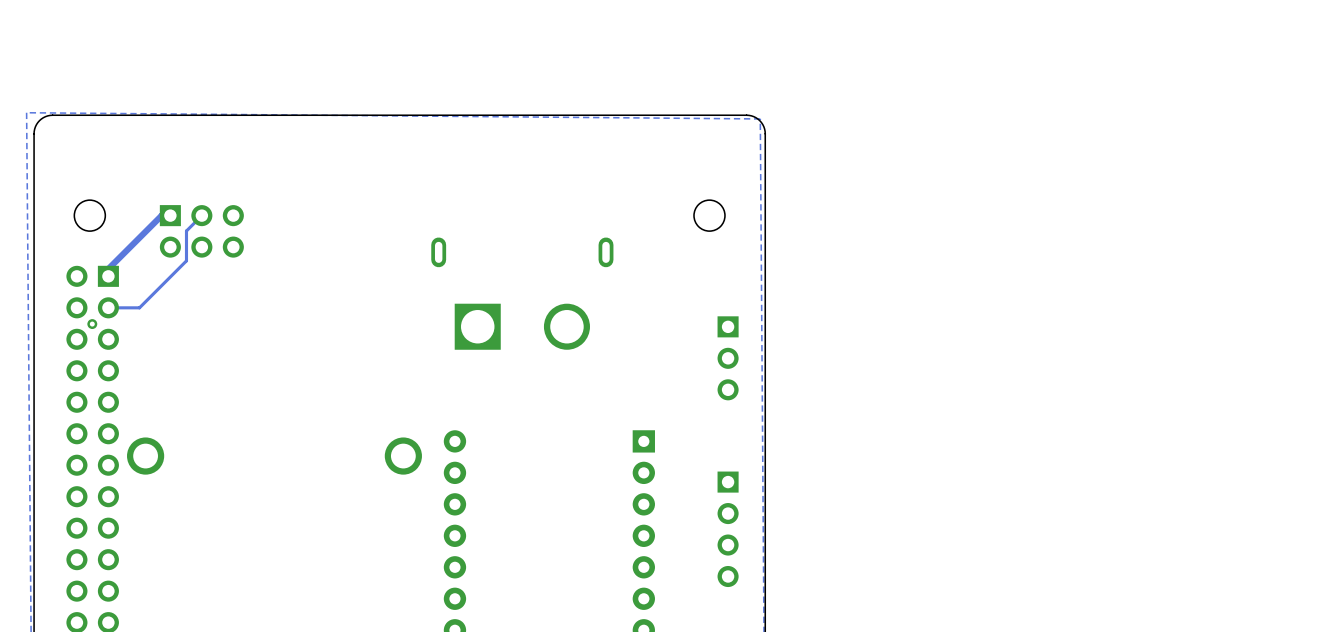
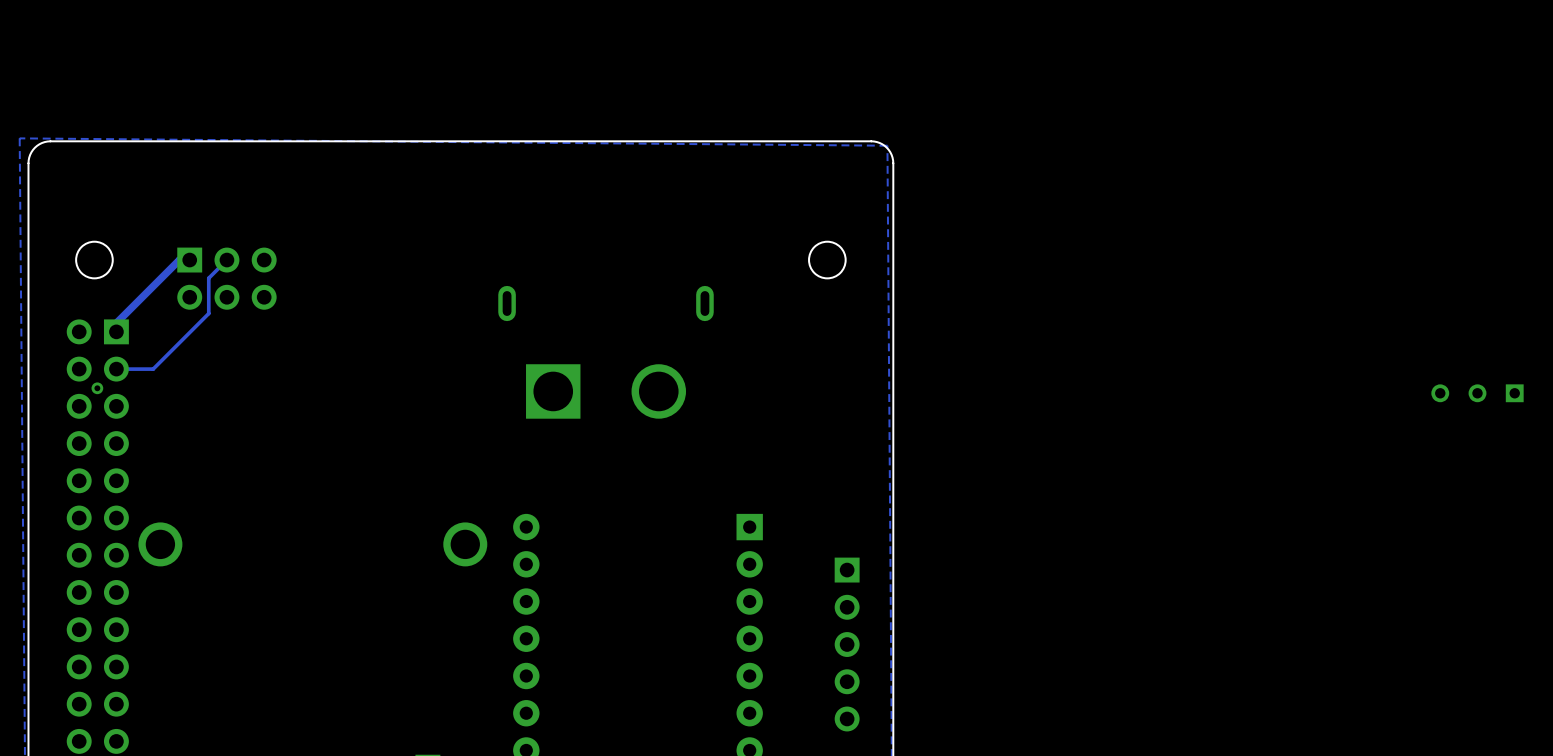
part: none -> (1477, 393)
part: (728, 358) -> none
part footprint: [717, 471, 739, 588] -> [834, 557, 860, 732]

